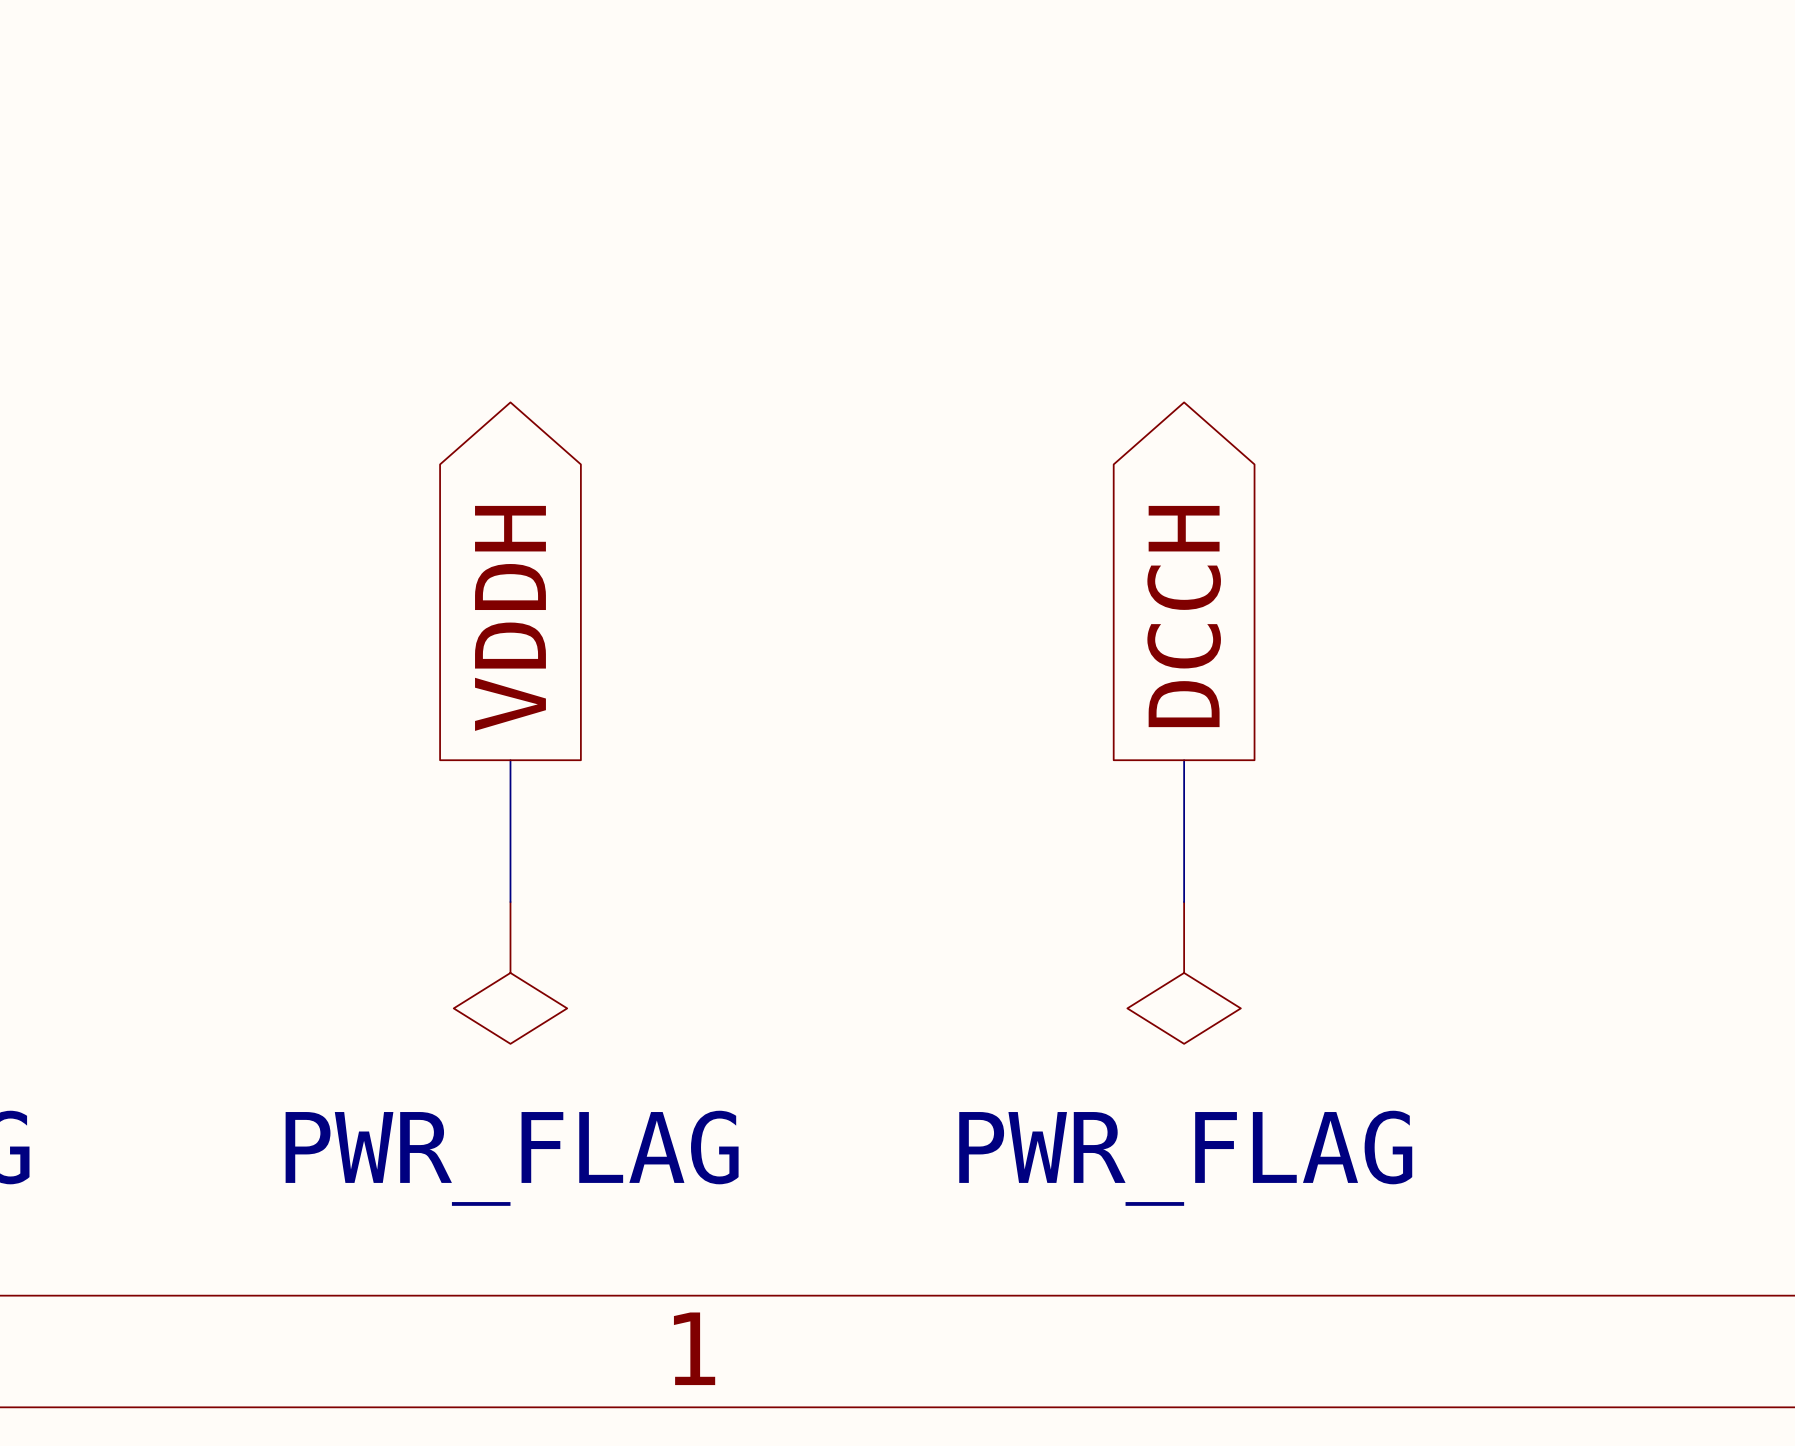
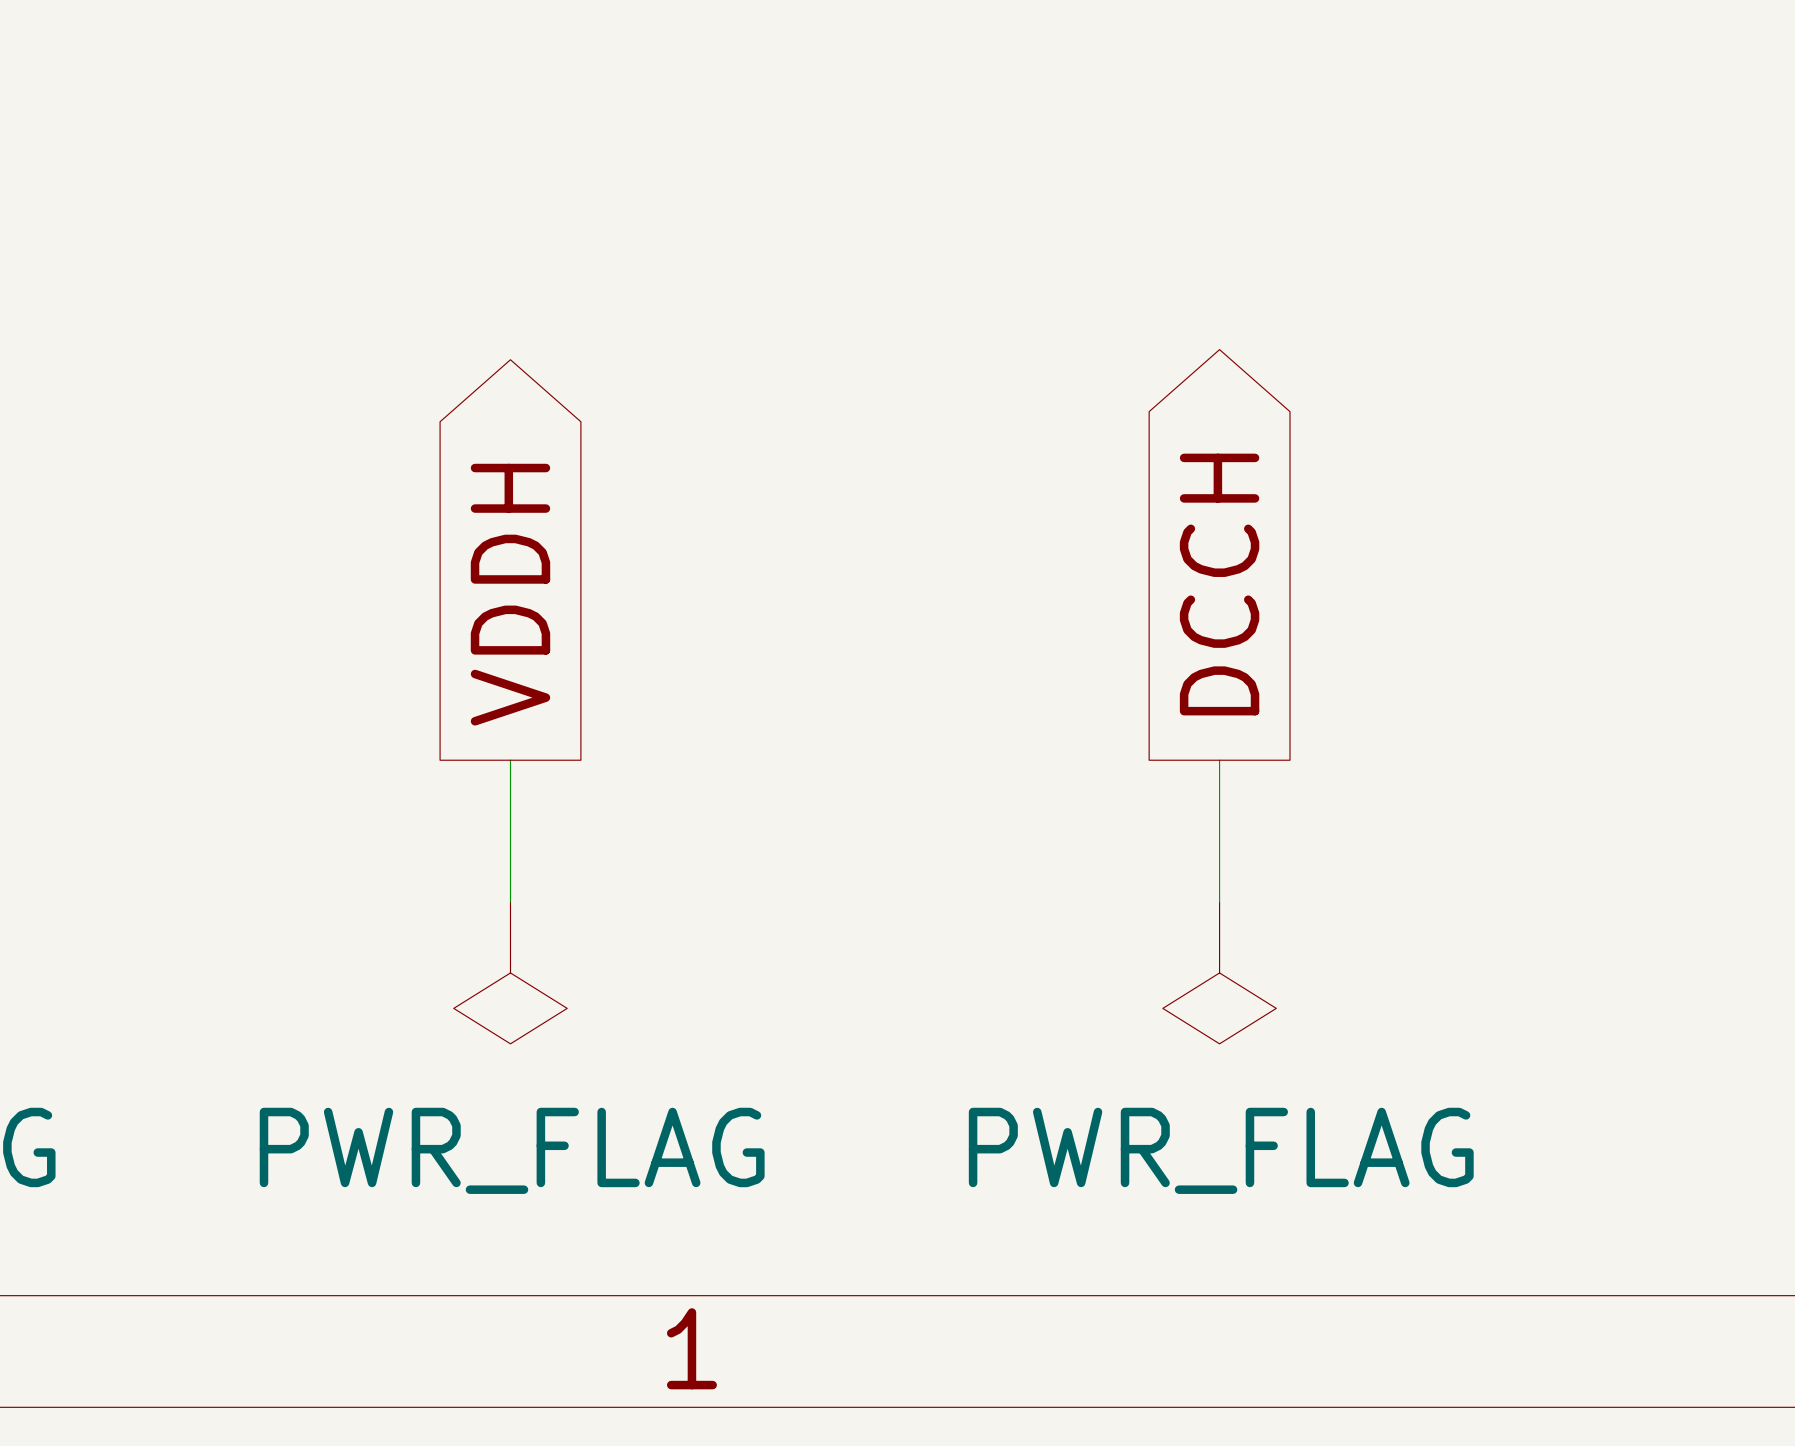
global label position: DCCH (1184, 616) -> DCCH (1219, 584)
wire: (1184, 760) (1184, 902) -> (1219, 760) (1219, 902)
power symbol position: PWR_FLAG (1184, 972) -> PWR_FLAG (1219, 972)

